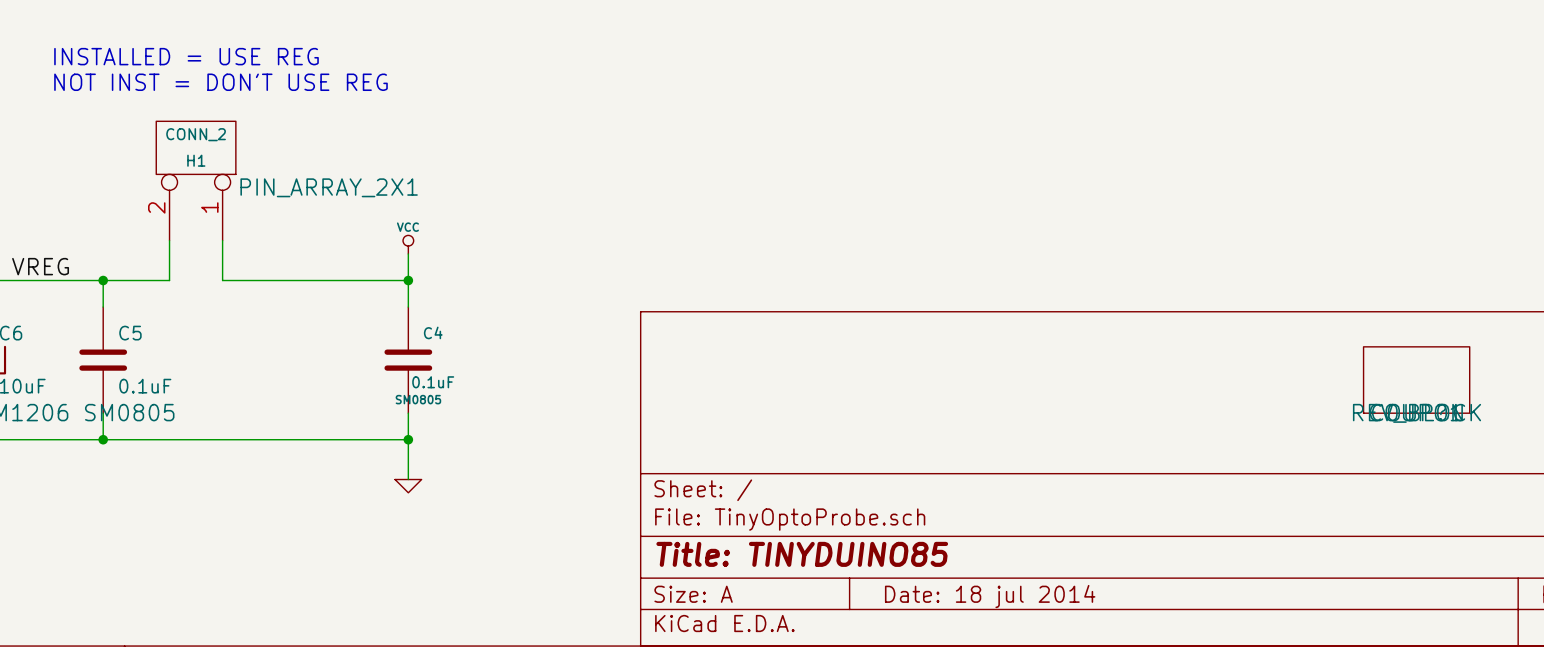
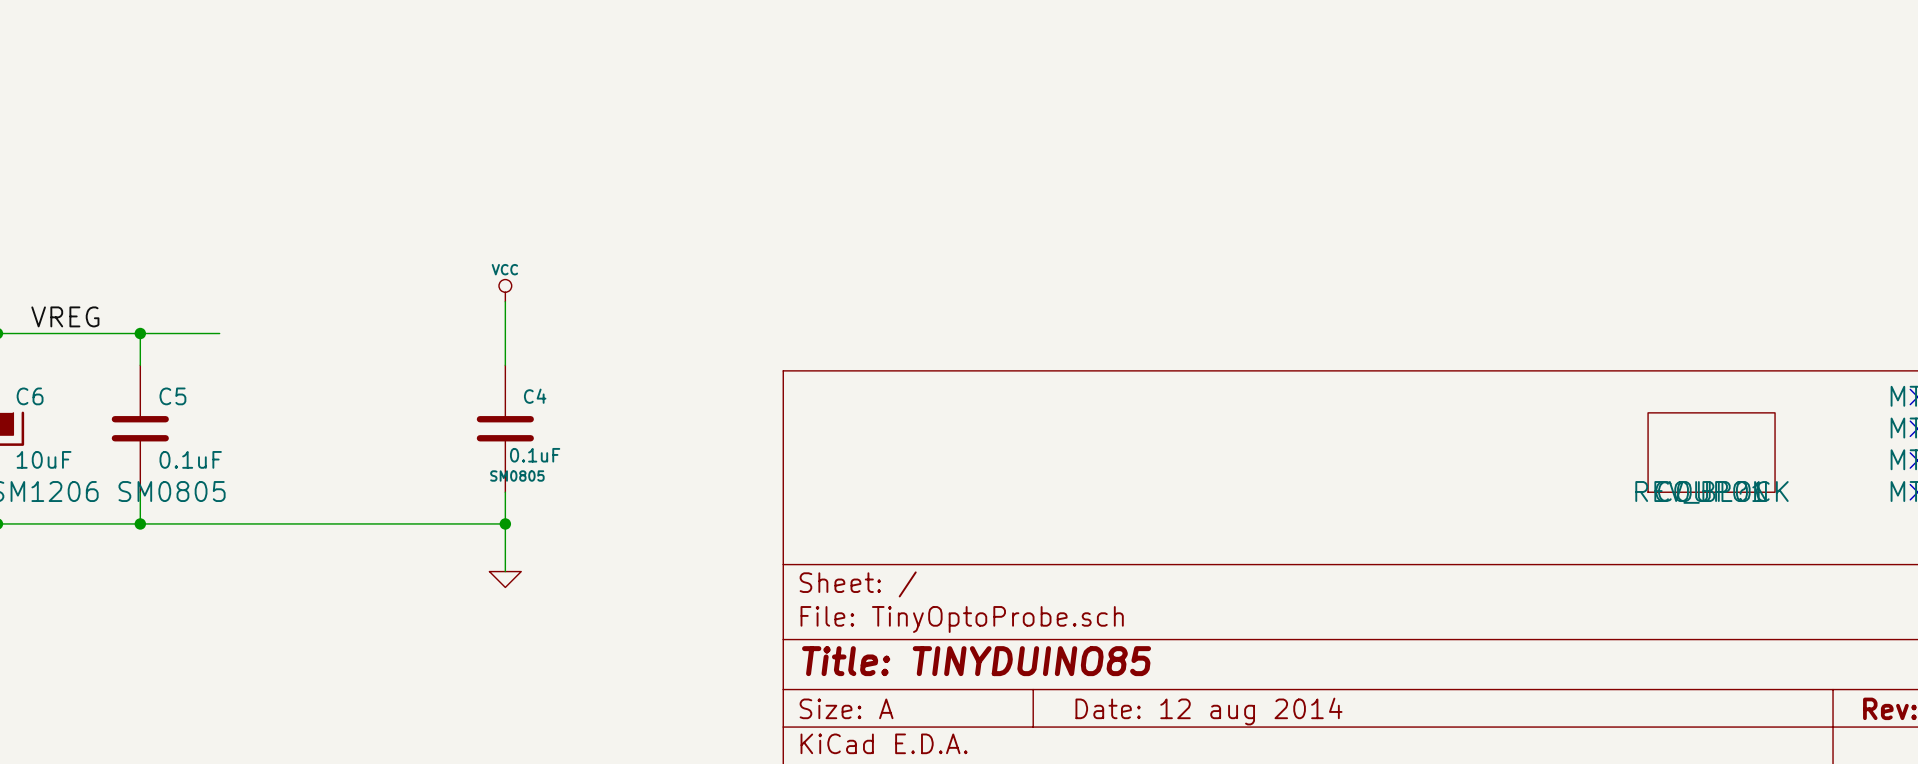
text: INSTALLED = USE REG (186, 56) -> none
text: NOT INST = DON'T USE REG (220, 82) -> none
H1: CONN_2 (196, 181) -> none
wire: (169, 240) (169, 280) -> none
wire: (222, 240) (222, 280) (408, 280) -> none
junction: (408, 280) -> none
title block: Date: 18 jul 2014 (990, 596) -> Date: 12 aug 2014 (1208, 711)

